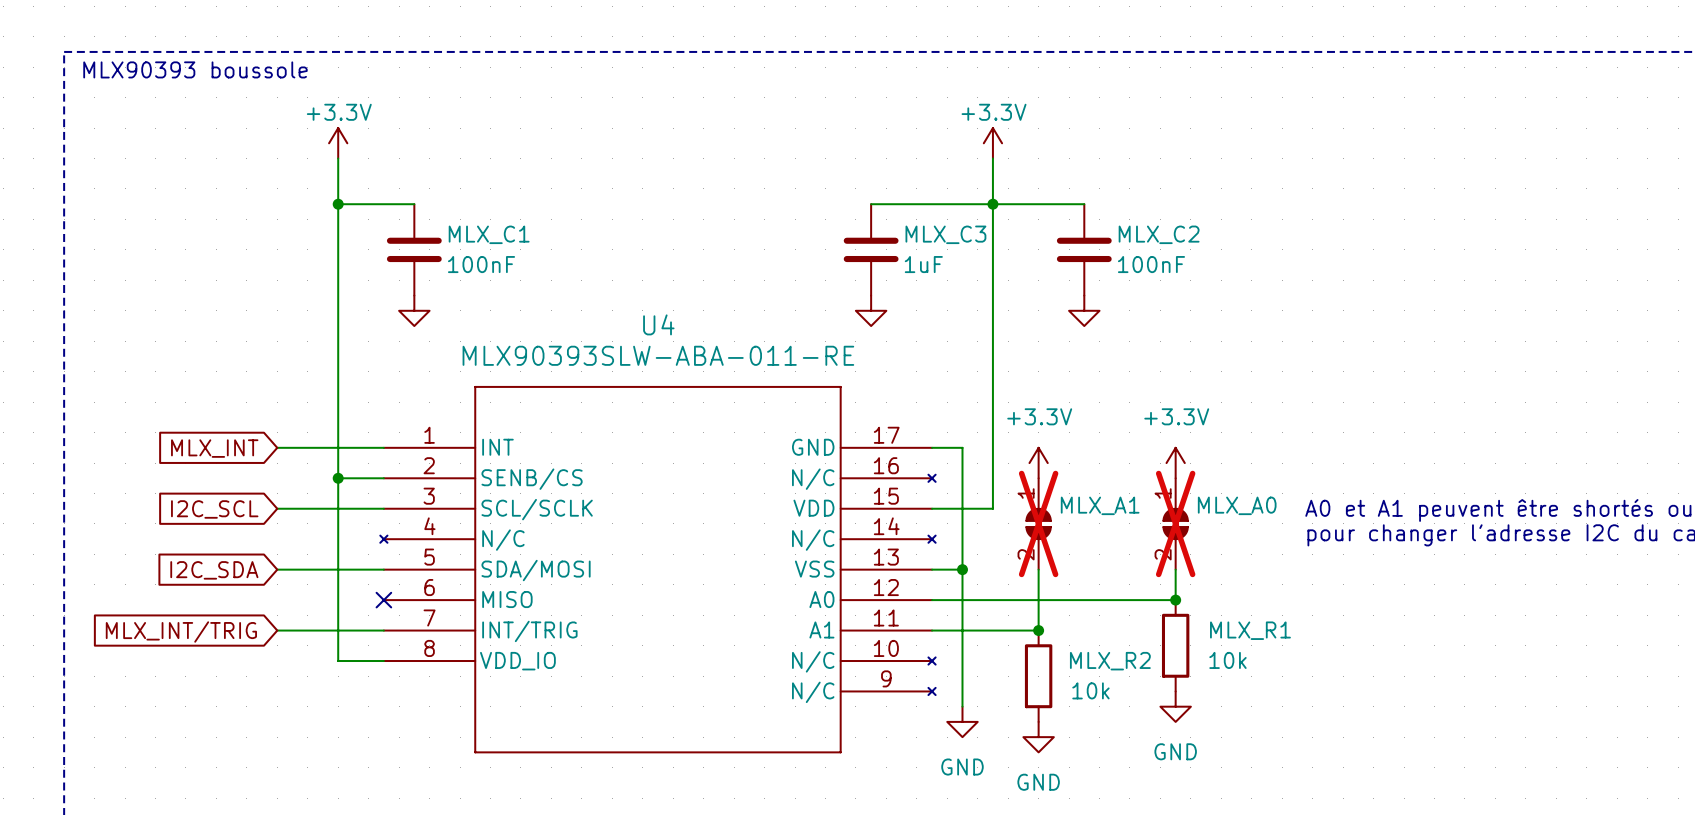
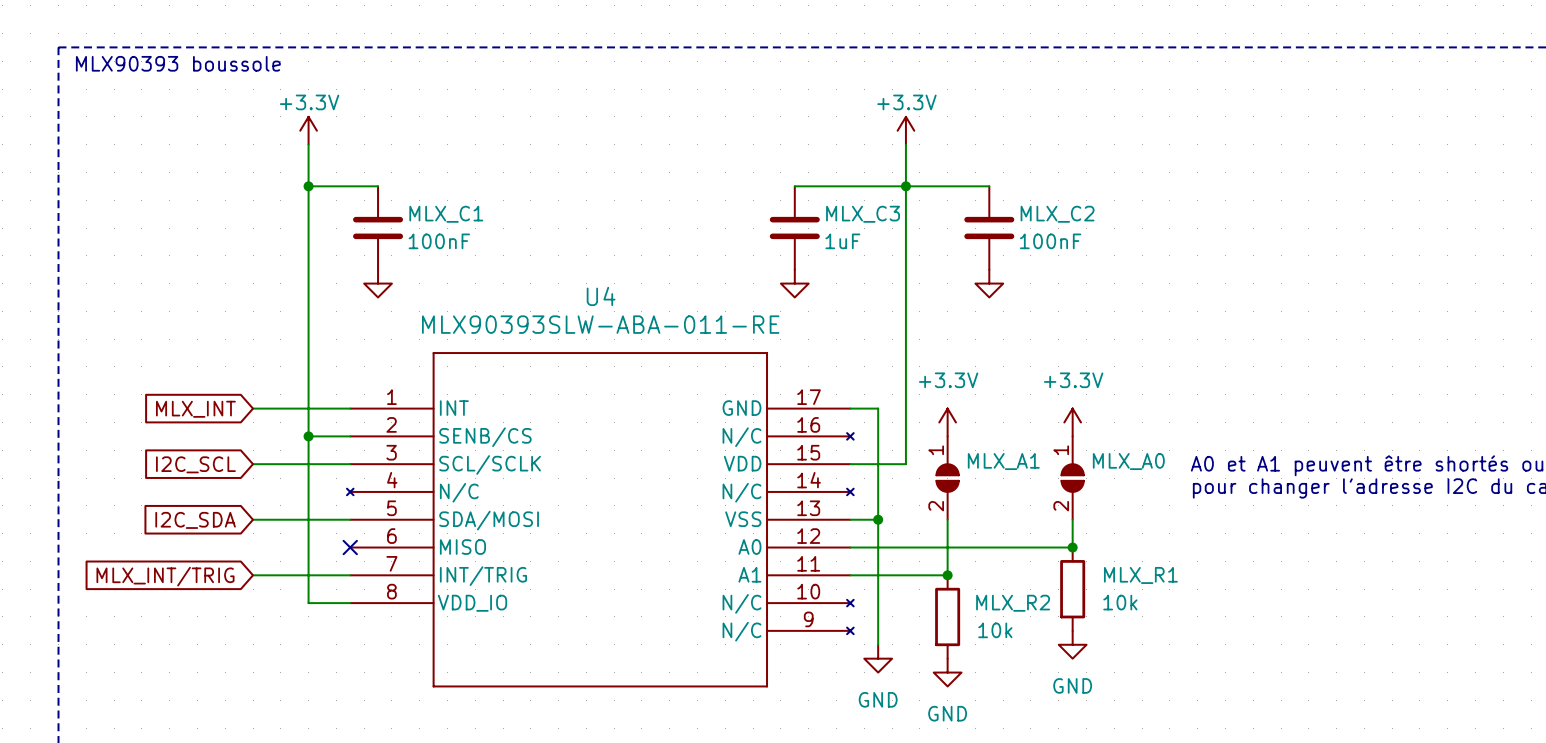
MLX_A1 do-not-place cross: (1038, 523) -> none
MLX_A0 do-not-place cross: (1175, 523) -> none

